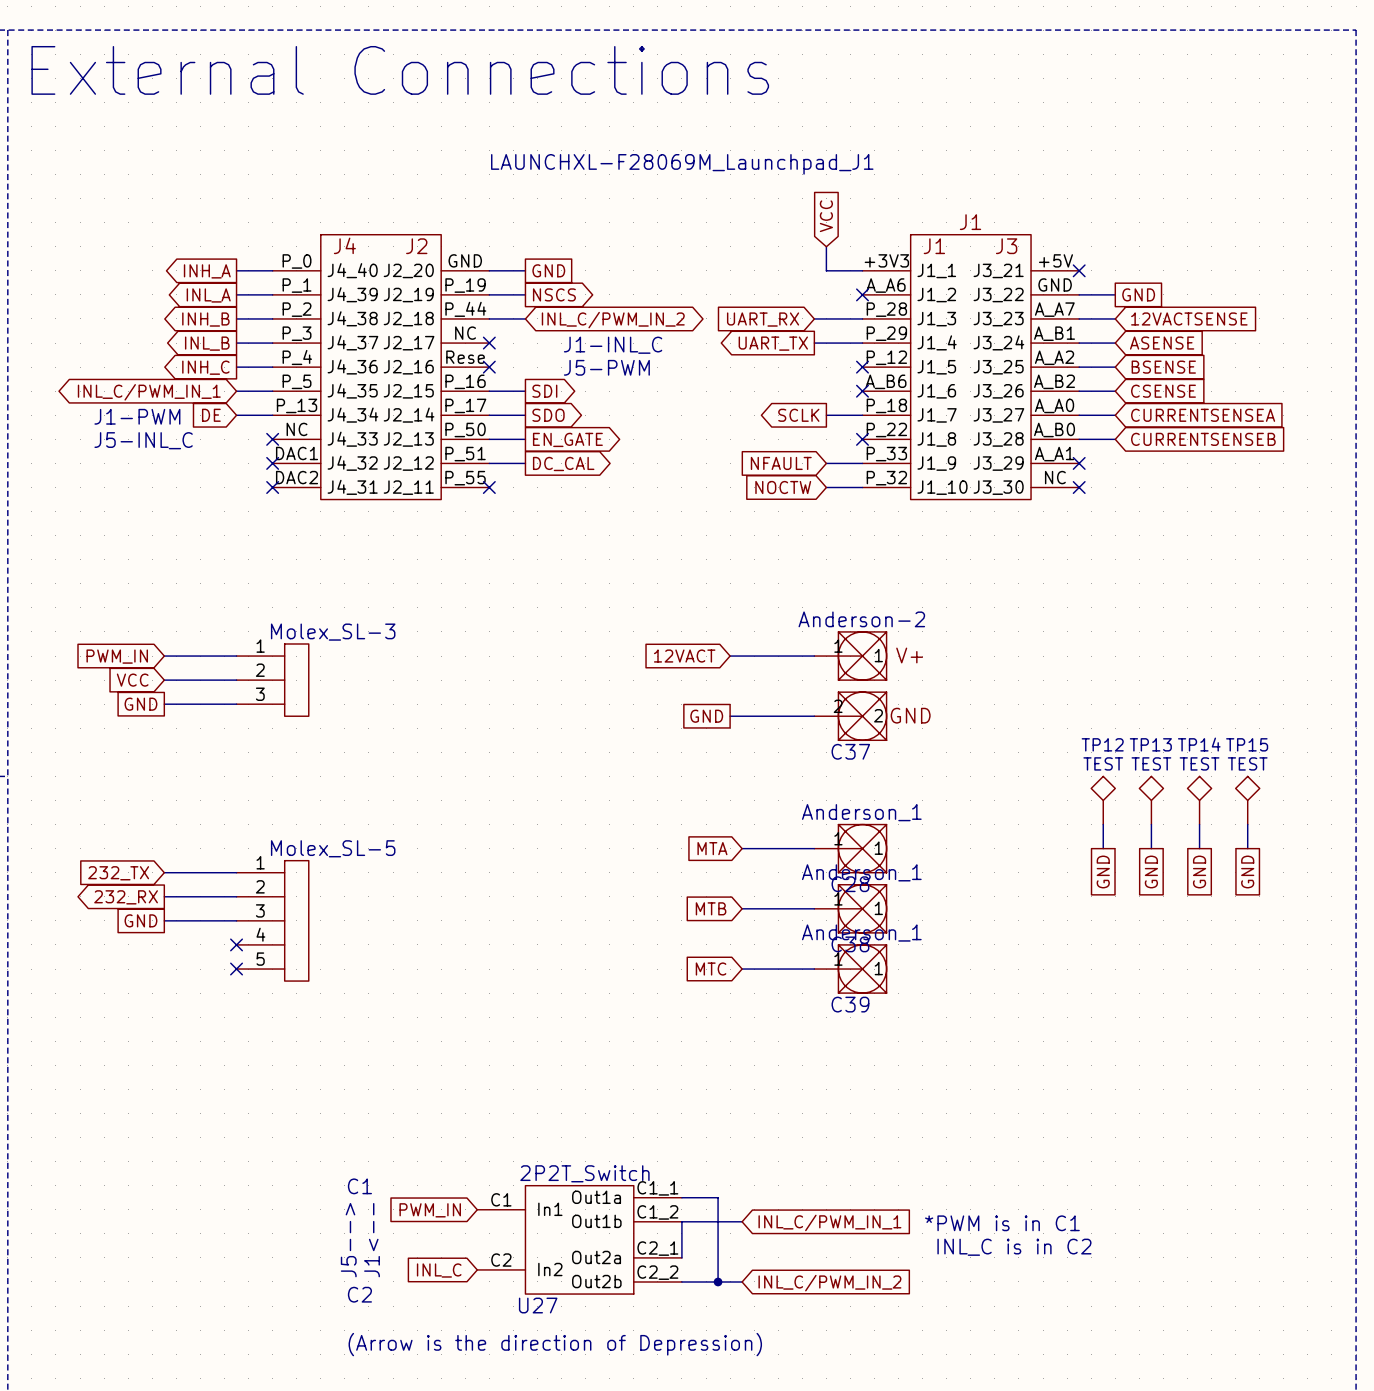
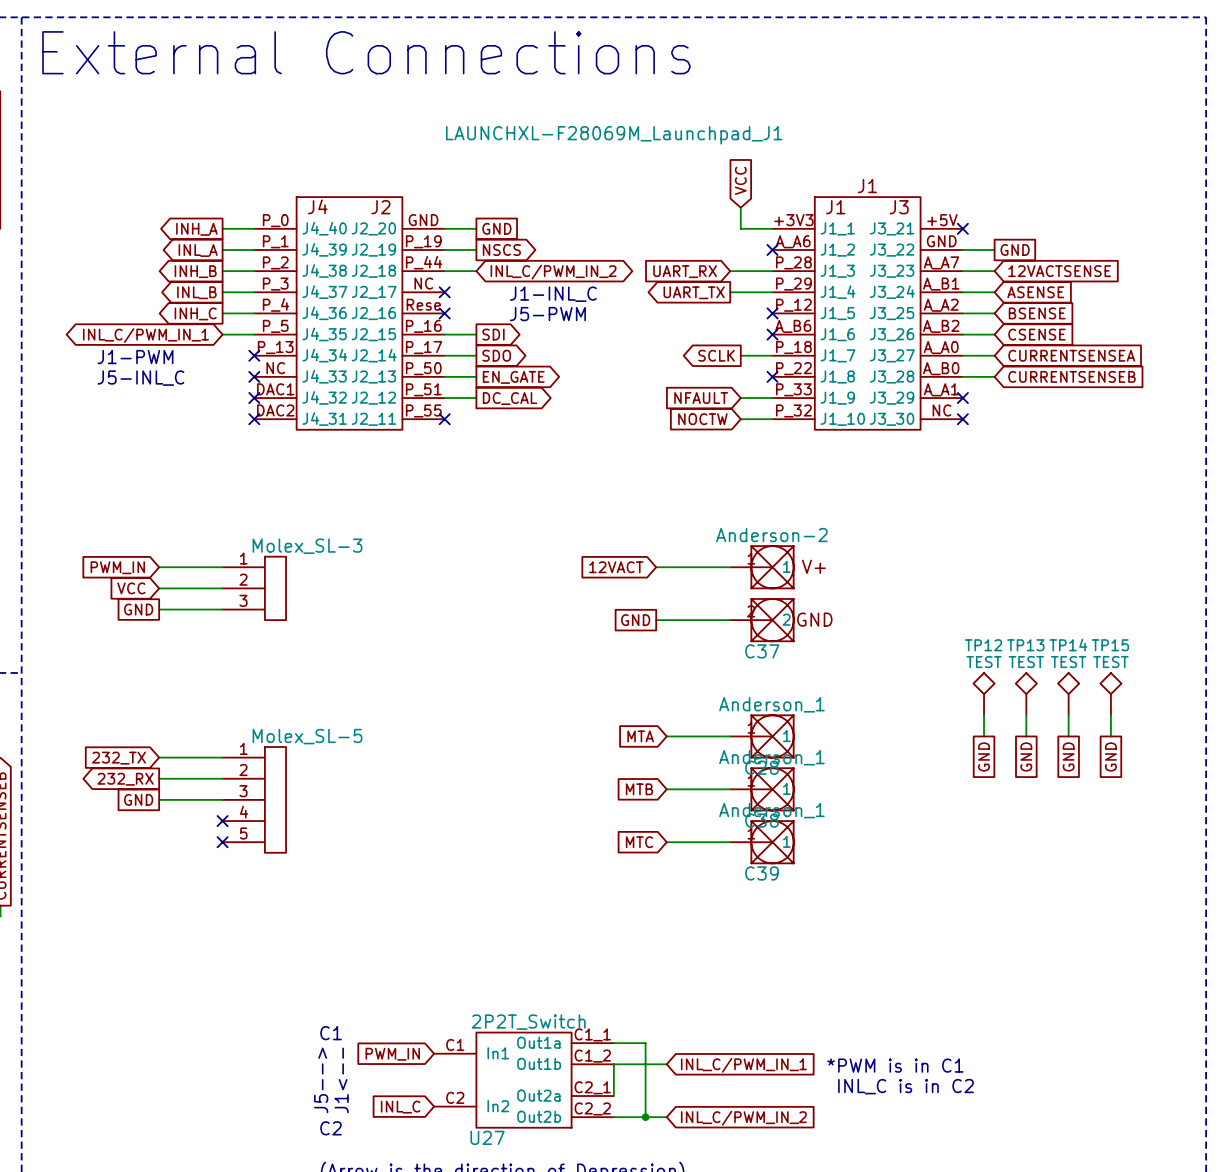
global label: DE (211, 415) -> none
wire: (236, 415) (272, 415) -> none
no-connect mark: none -> (254, 355)

